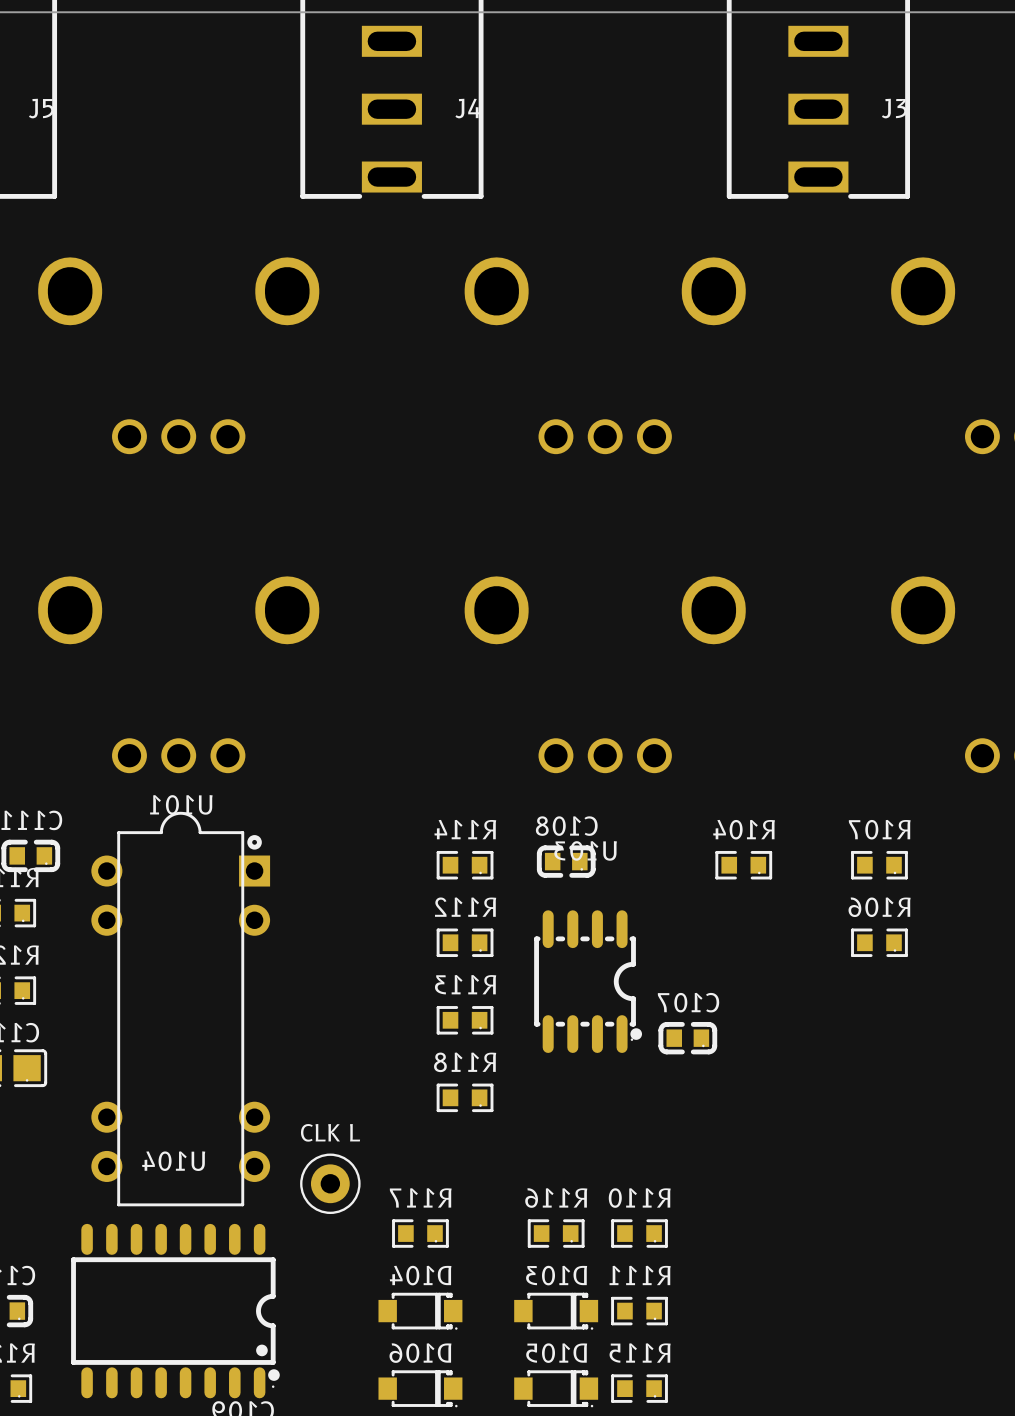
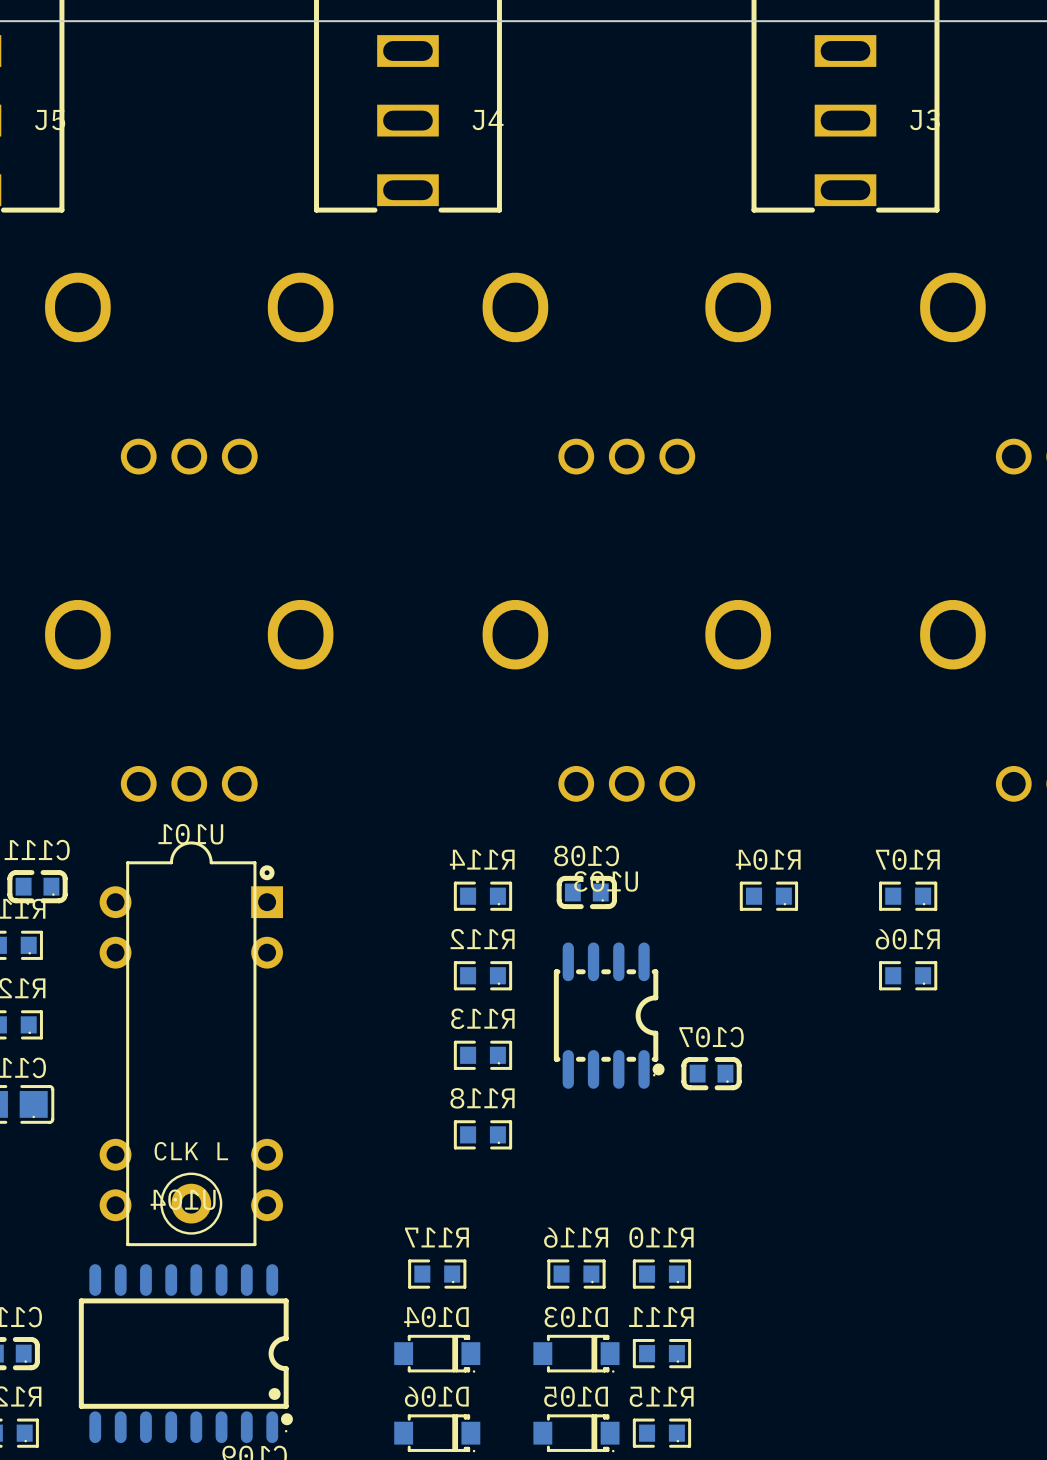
part position: (330, 1183) -> (191, 1203)

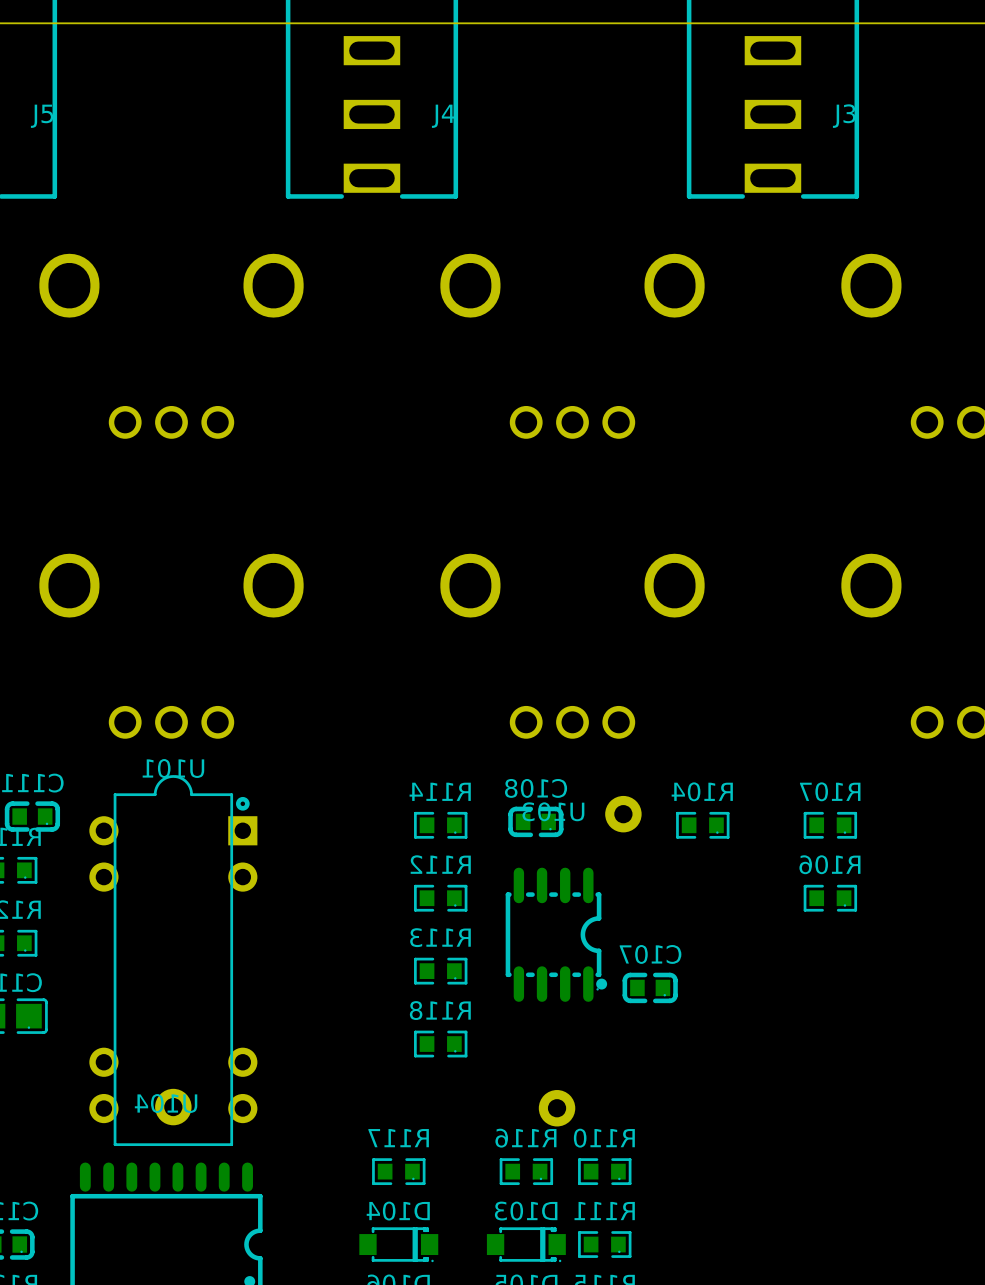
part: none -> (623, 814)
part side: bottom (191, 1203) -> top (173, 1107)
part: none -> (557, 1108)

